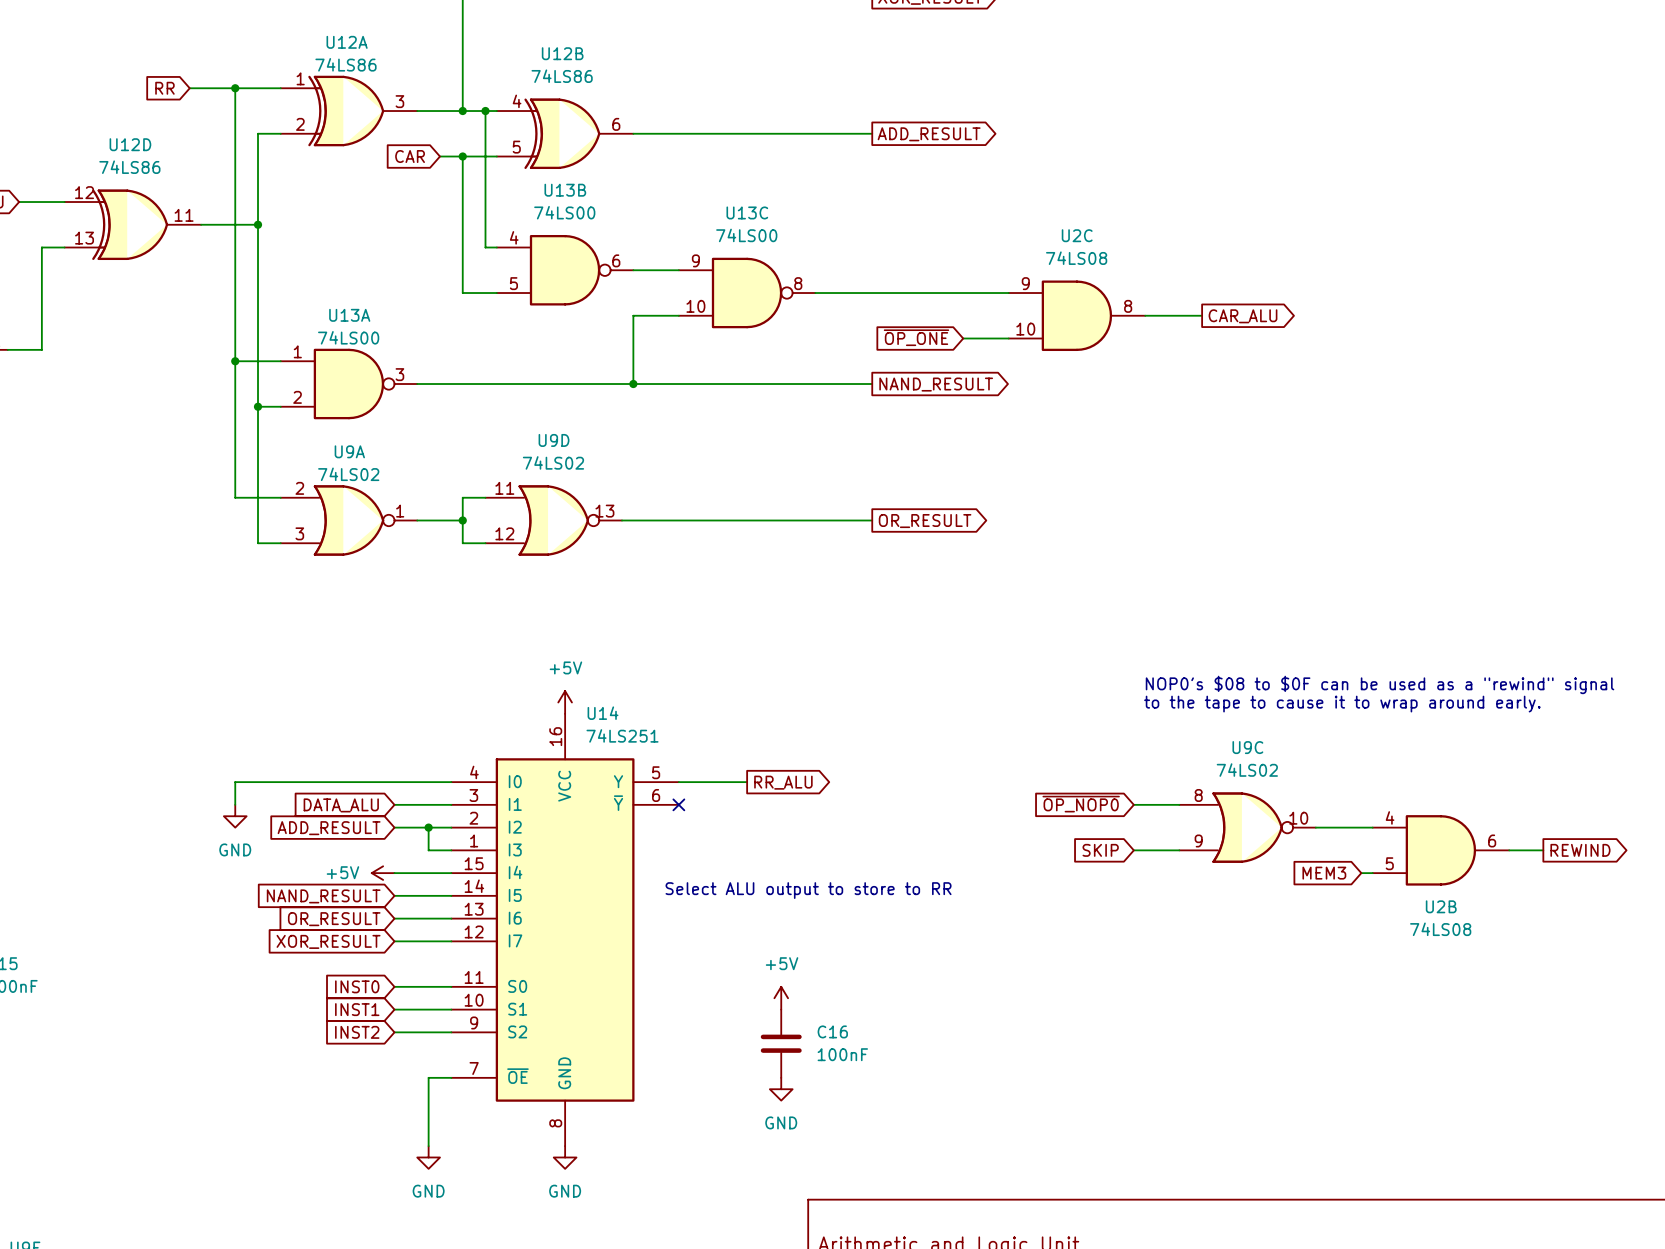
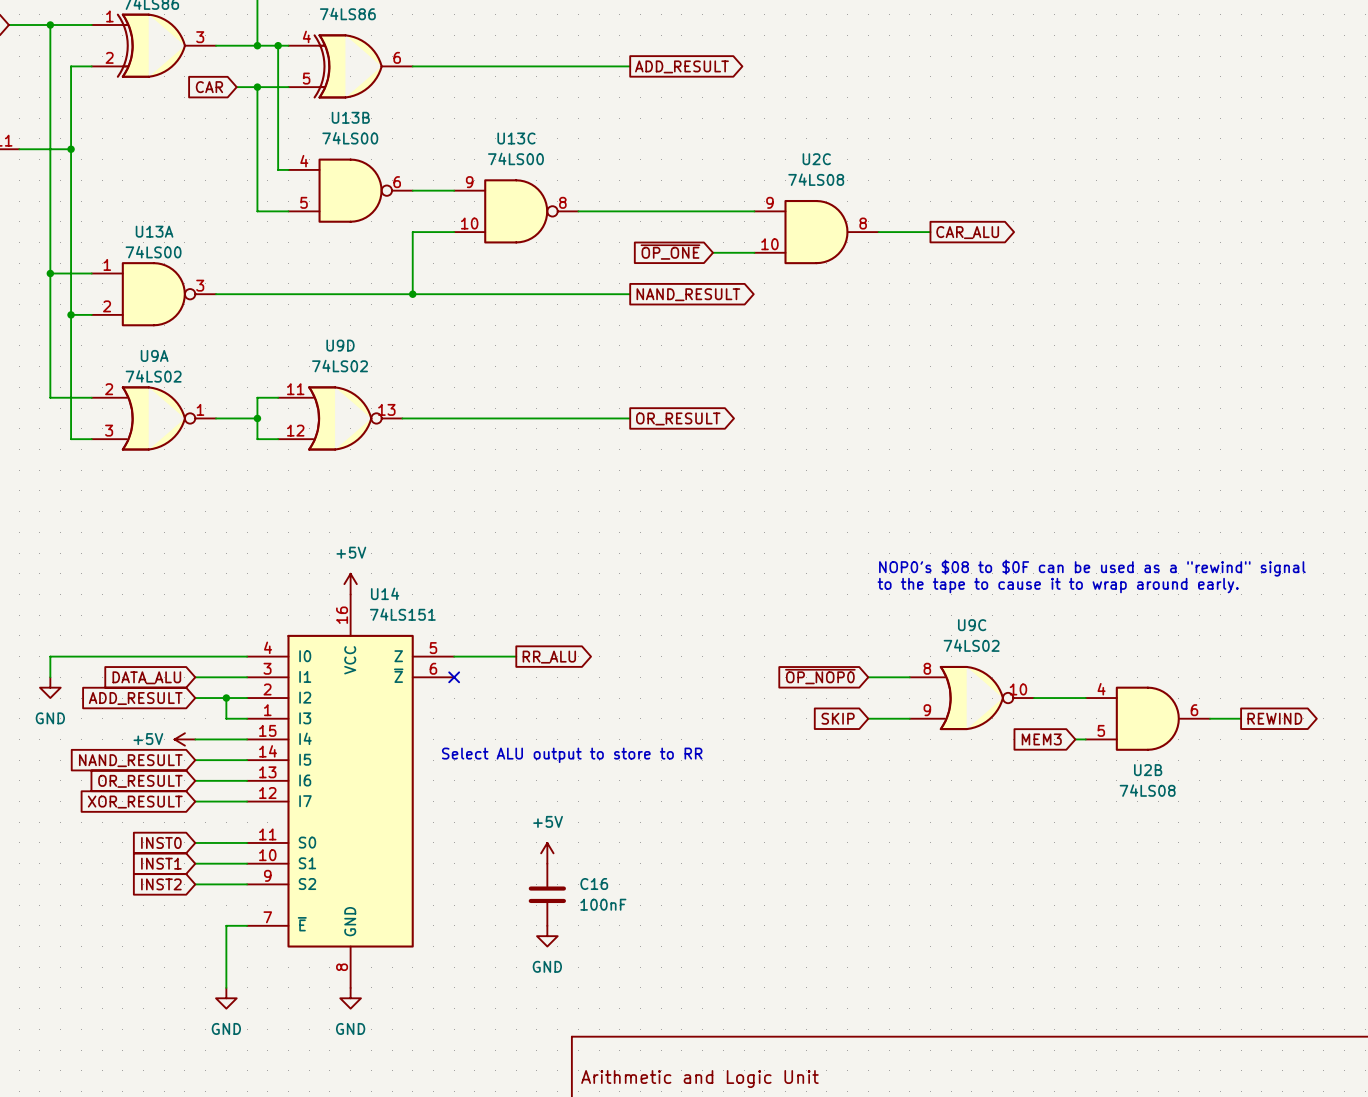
U14 value: 74LS251 (622, 735) -> 74LS151 (402, 614)
U14 pin name: Y (618, 781) -> Z (398, 656)
U14 pin name: ~{Y} (618, 803) -> ~{Z} (398, 675)
U14 pin name: ~{OE} (517, 1076) -> ~{E} (302, 924)

